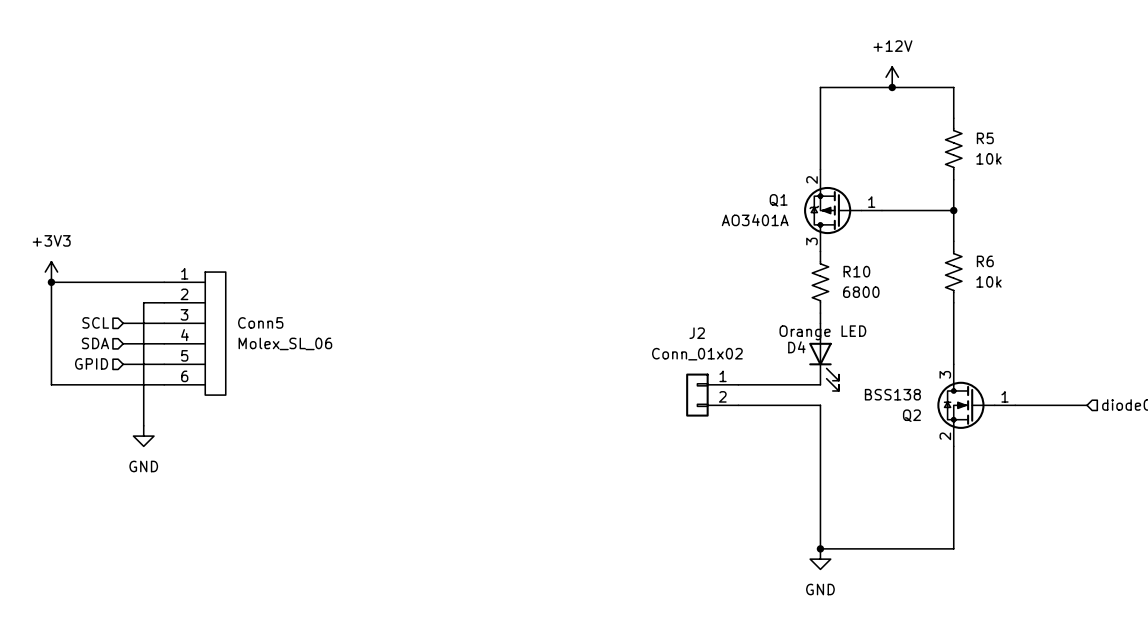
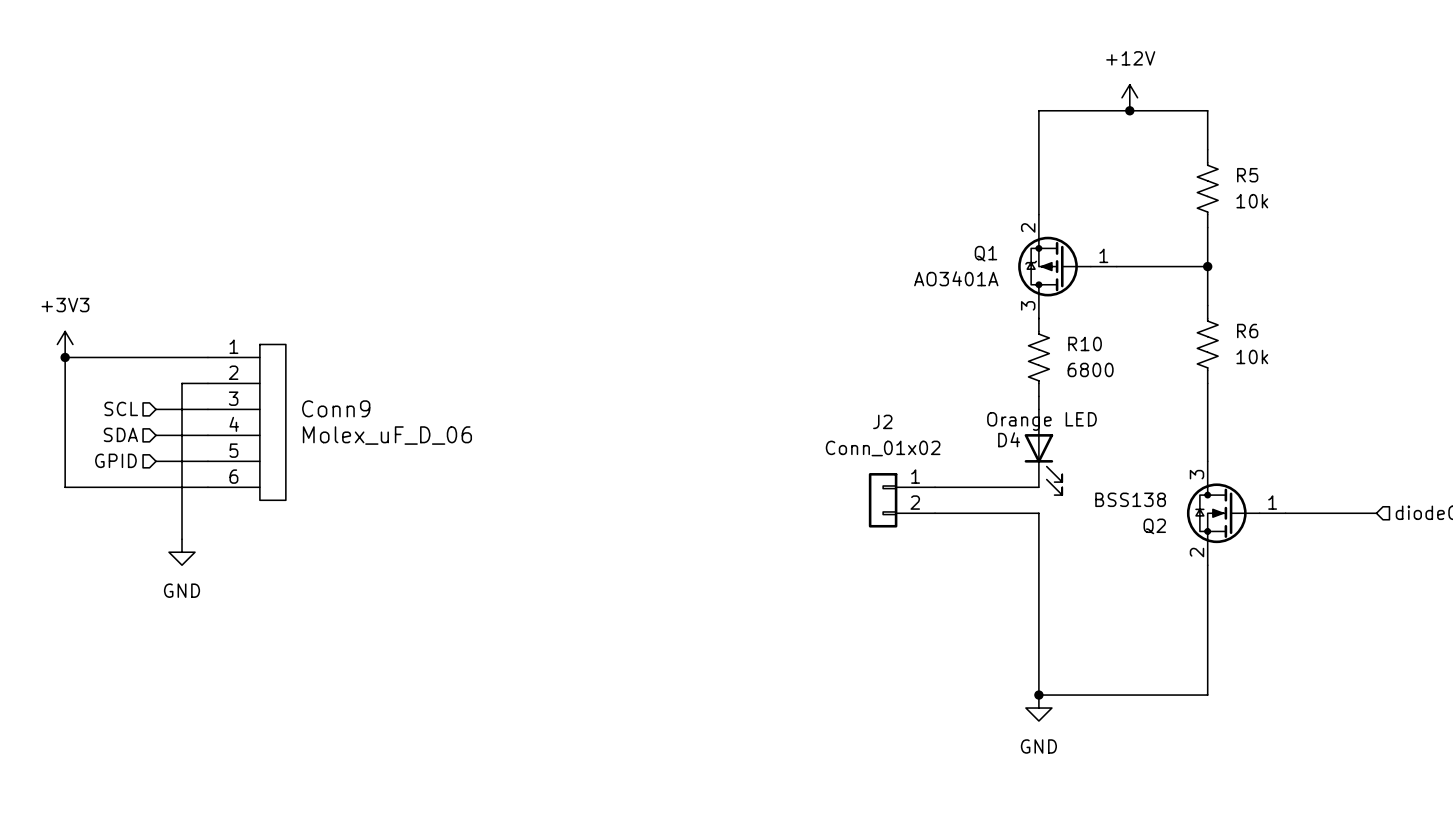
Conn5 name: Conn5 (260, 322) -> Conn9 (336, 408)
Conn5 value: Molex_SL_06 (285, 343) -> Molex_uF_D_06 (387, 435)

